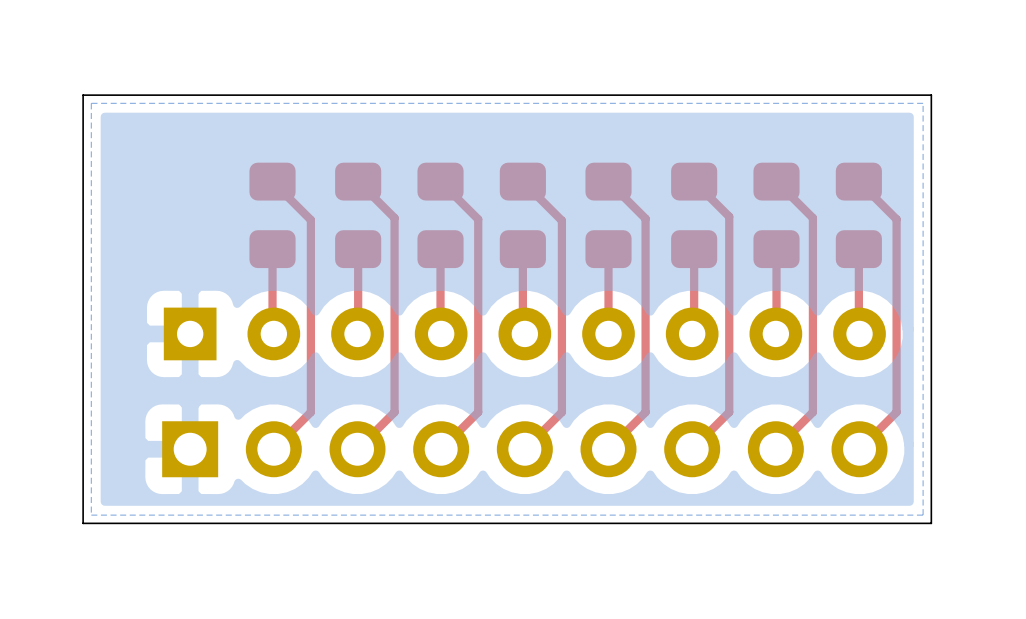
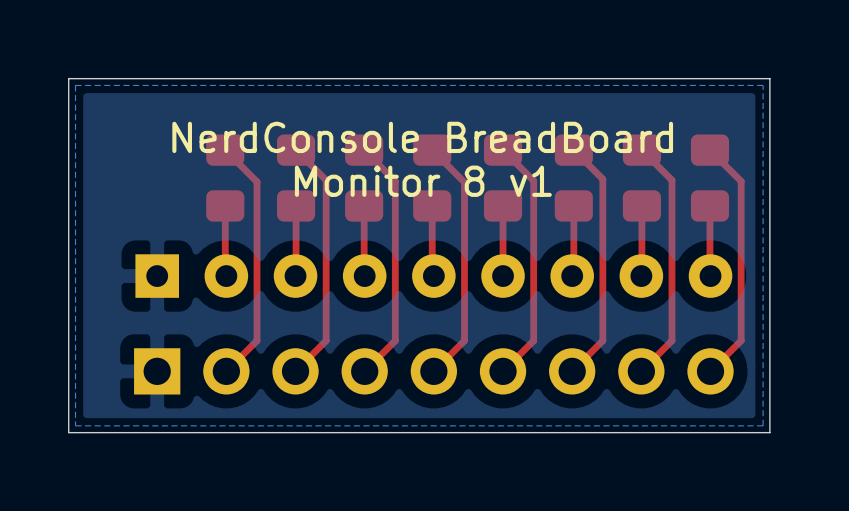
text: none -> NerdConsole BreadBoard (422, 137)
text: none -> Monitor 8 v1 (423, 181)

